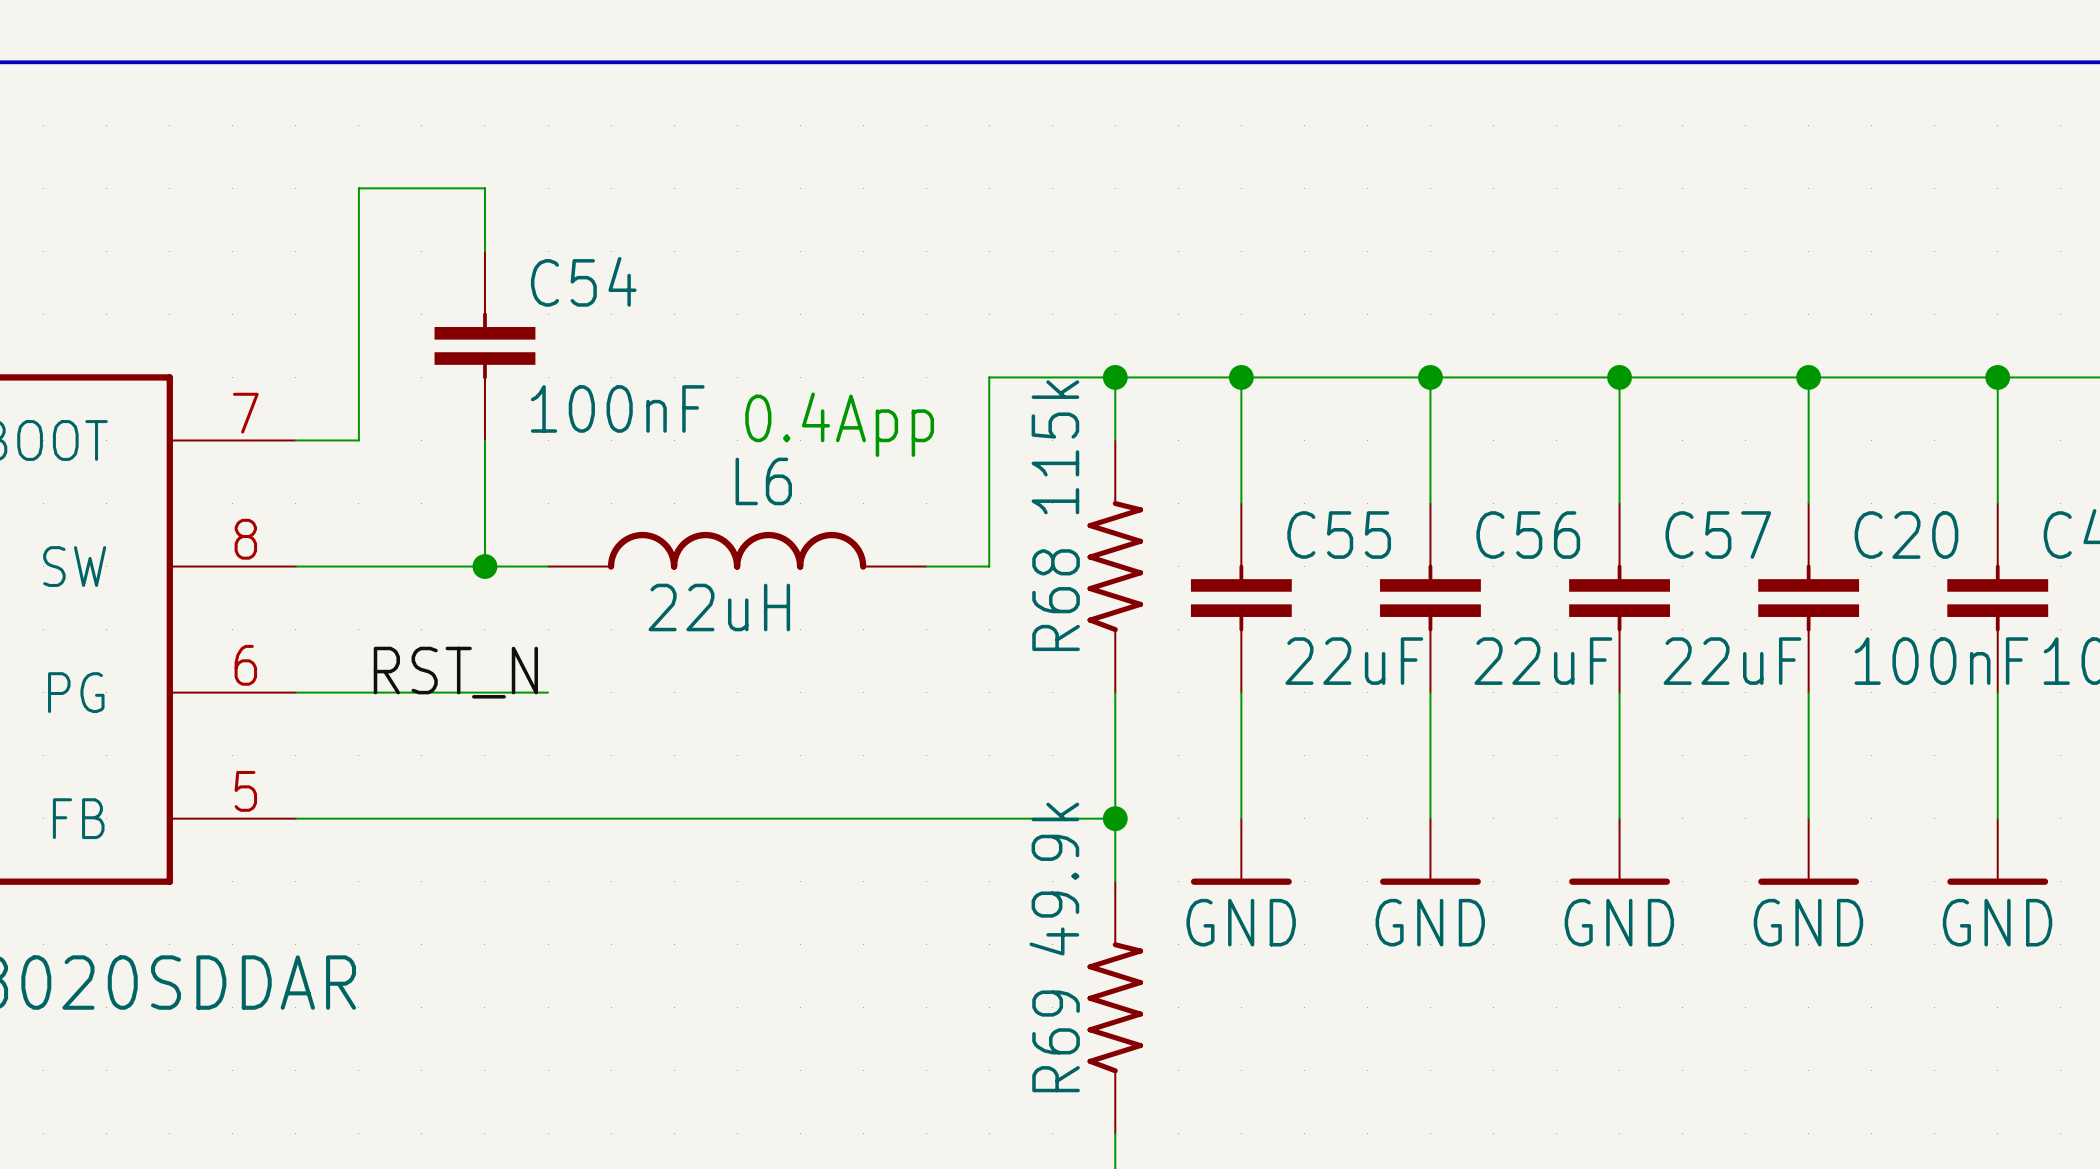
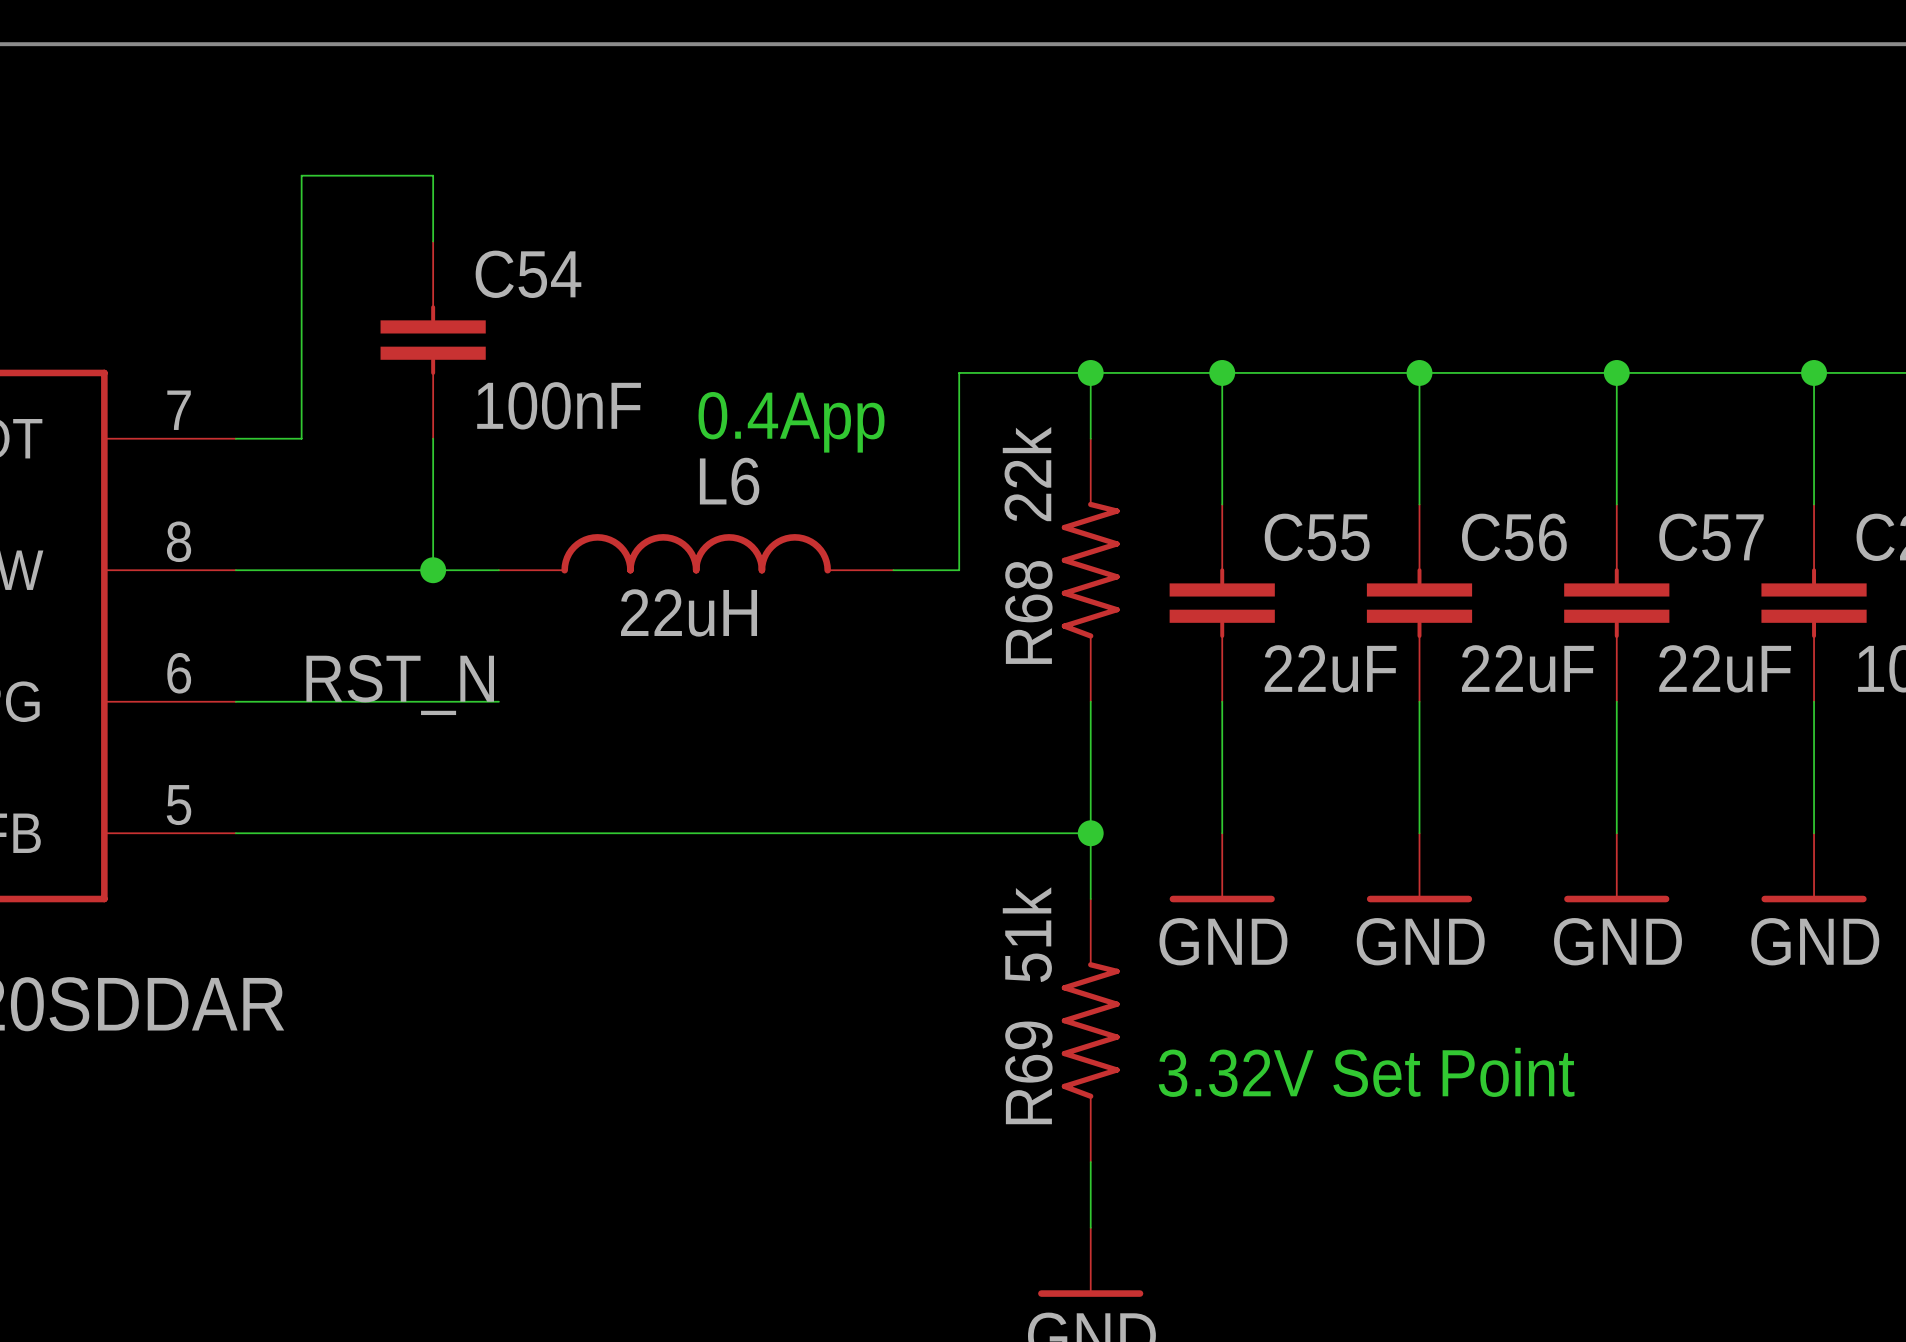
R68 value: 115k (1055, 447) -> 22k (1027, 474)
R69 value: 49.9k (1054, 879) -> 51k (1027, 934)
text: none -> 3.32V Set Point (1366, 1072)

